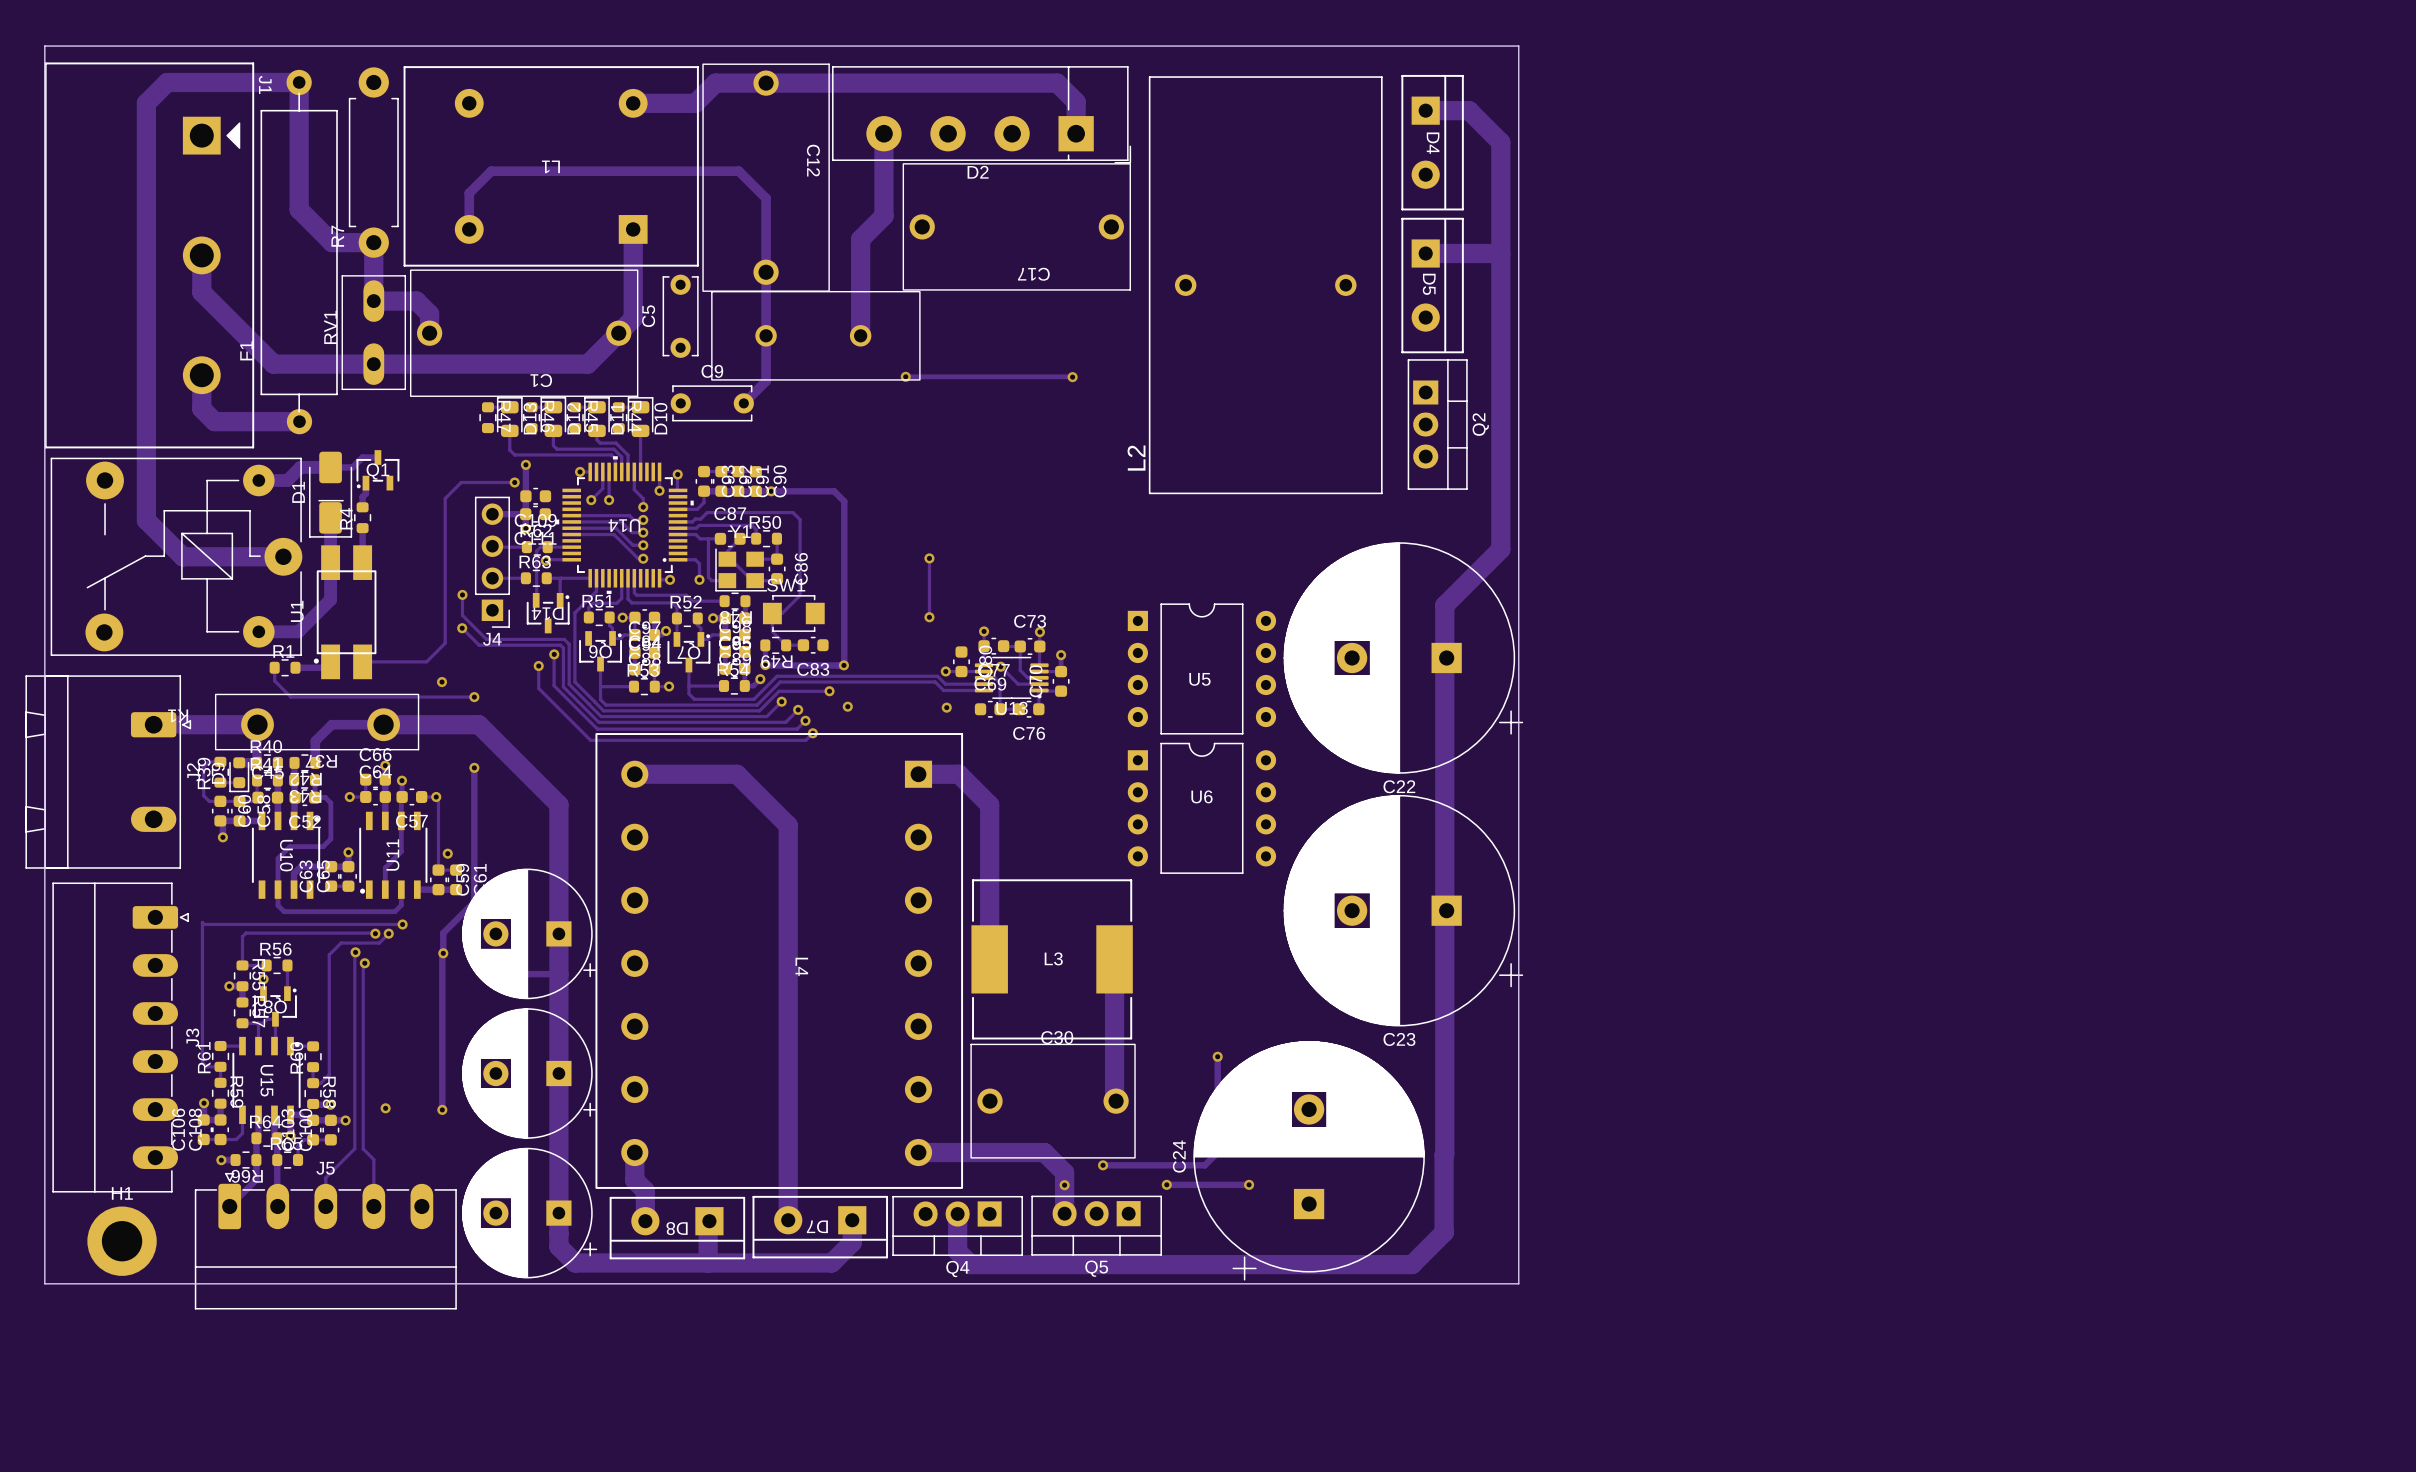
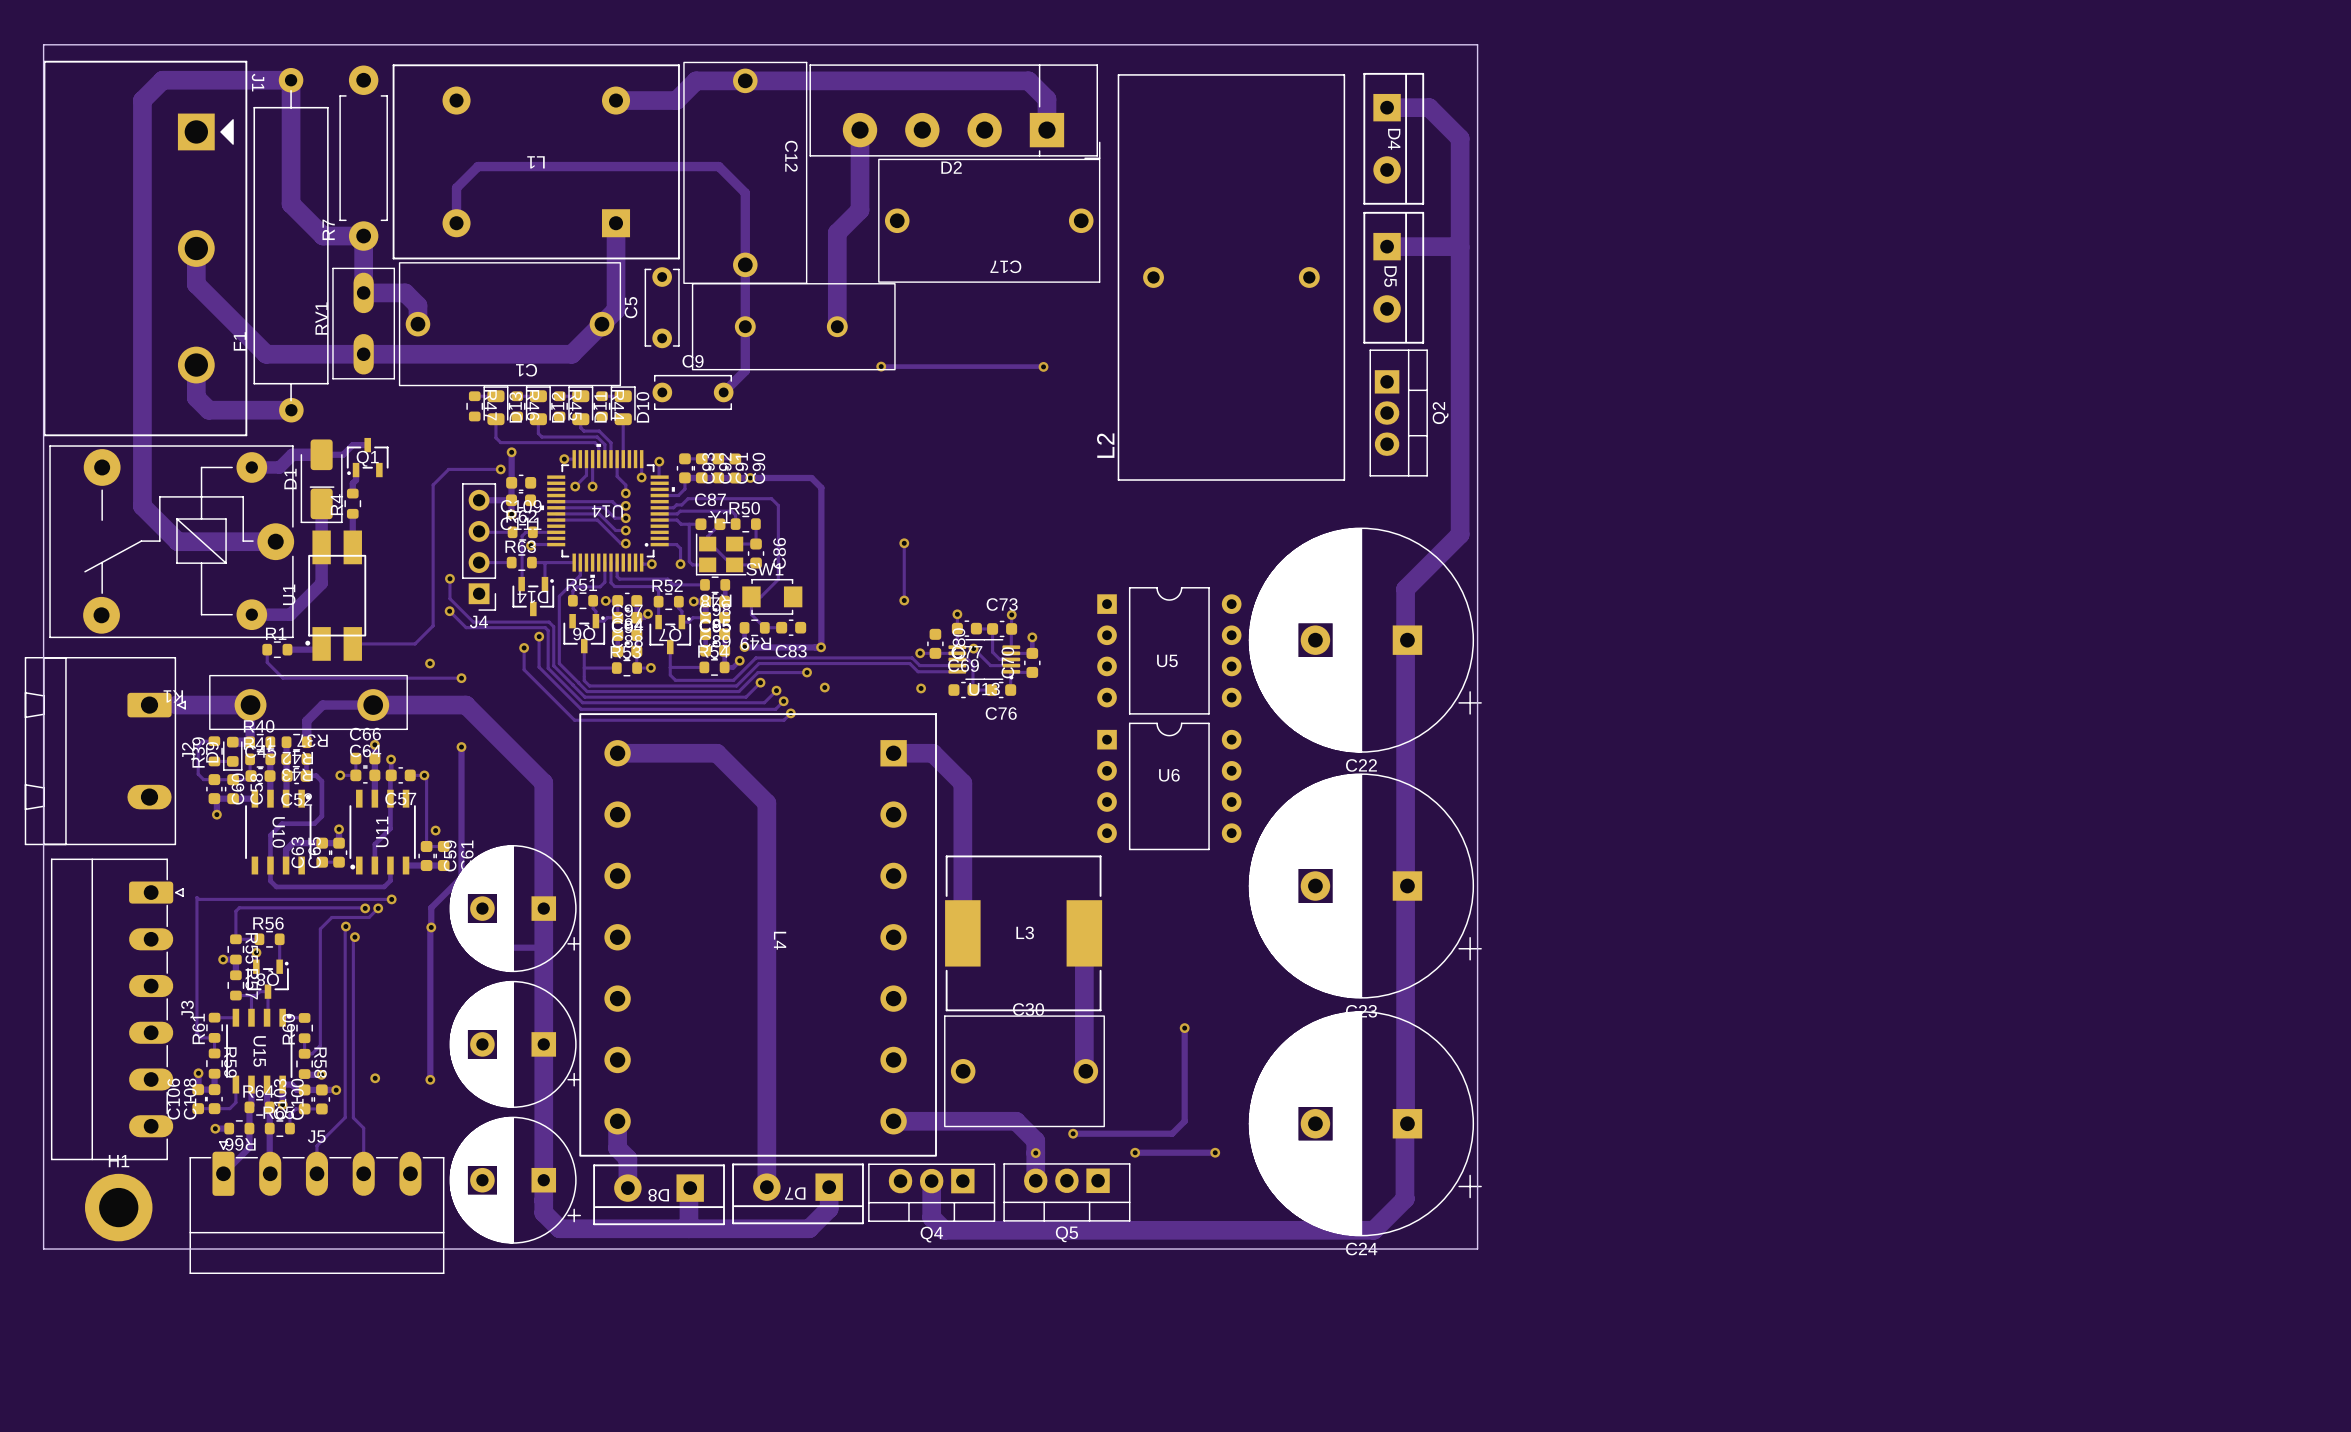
C24 rotation: 0° (1309, 1160) -> 90° counterclockwise (1365, 1123)

